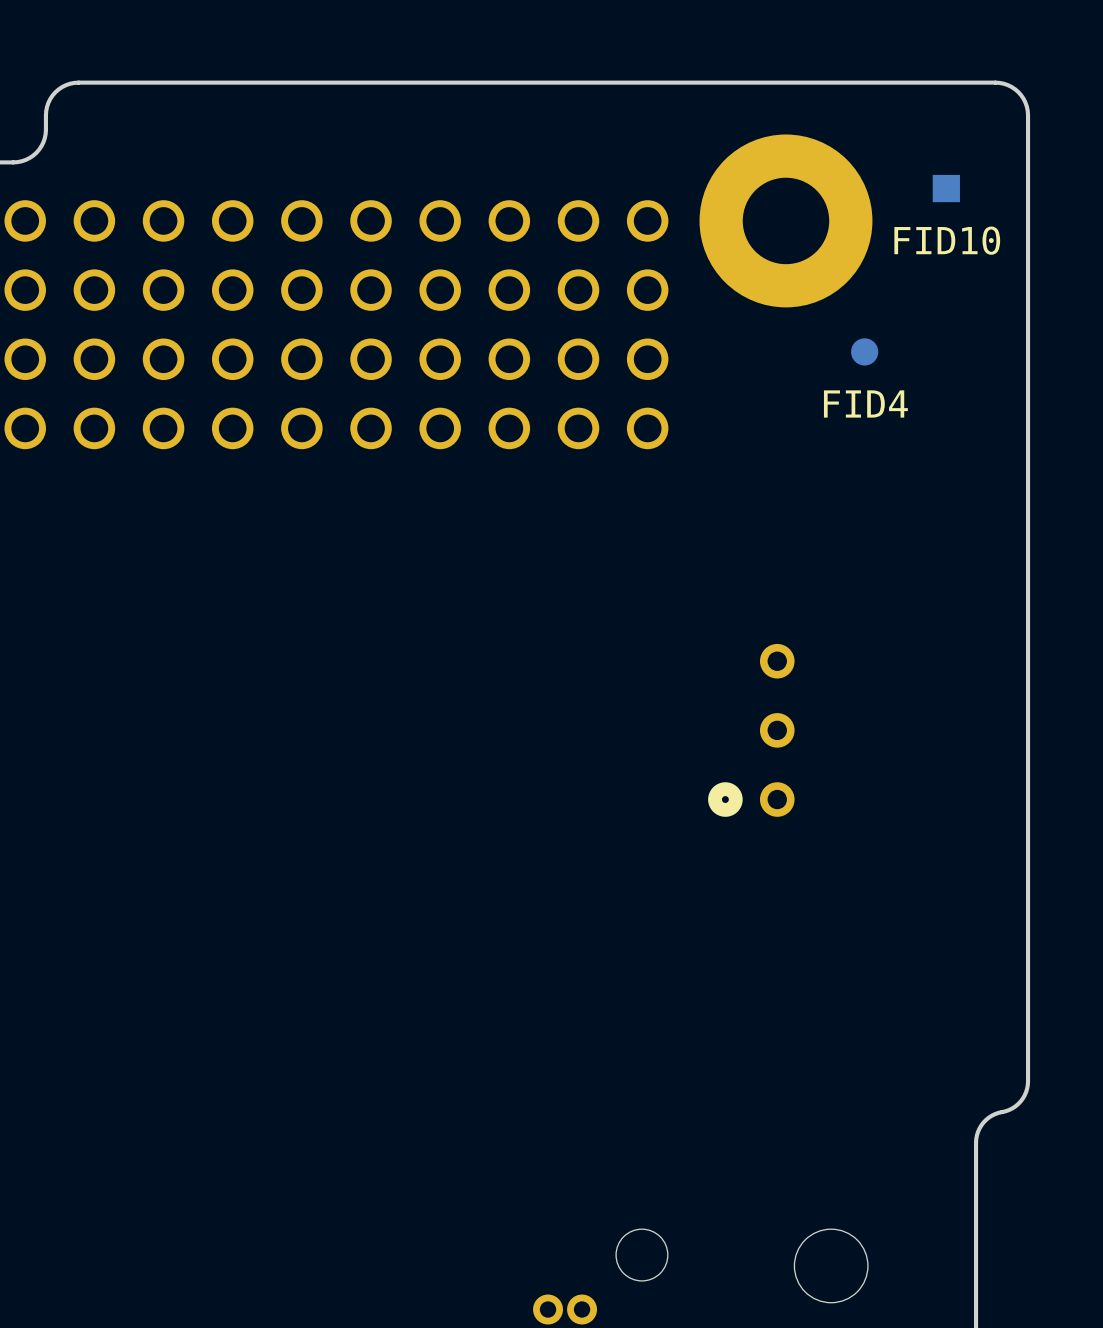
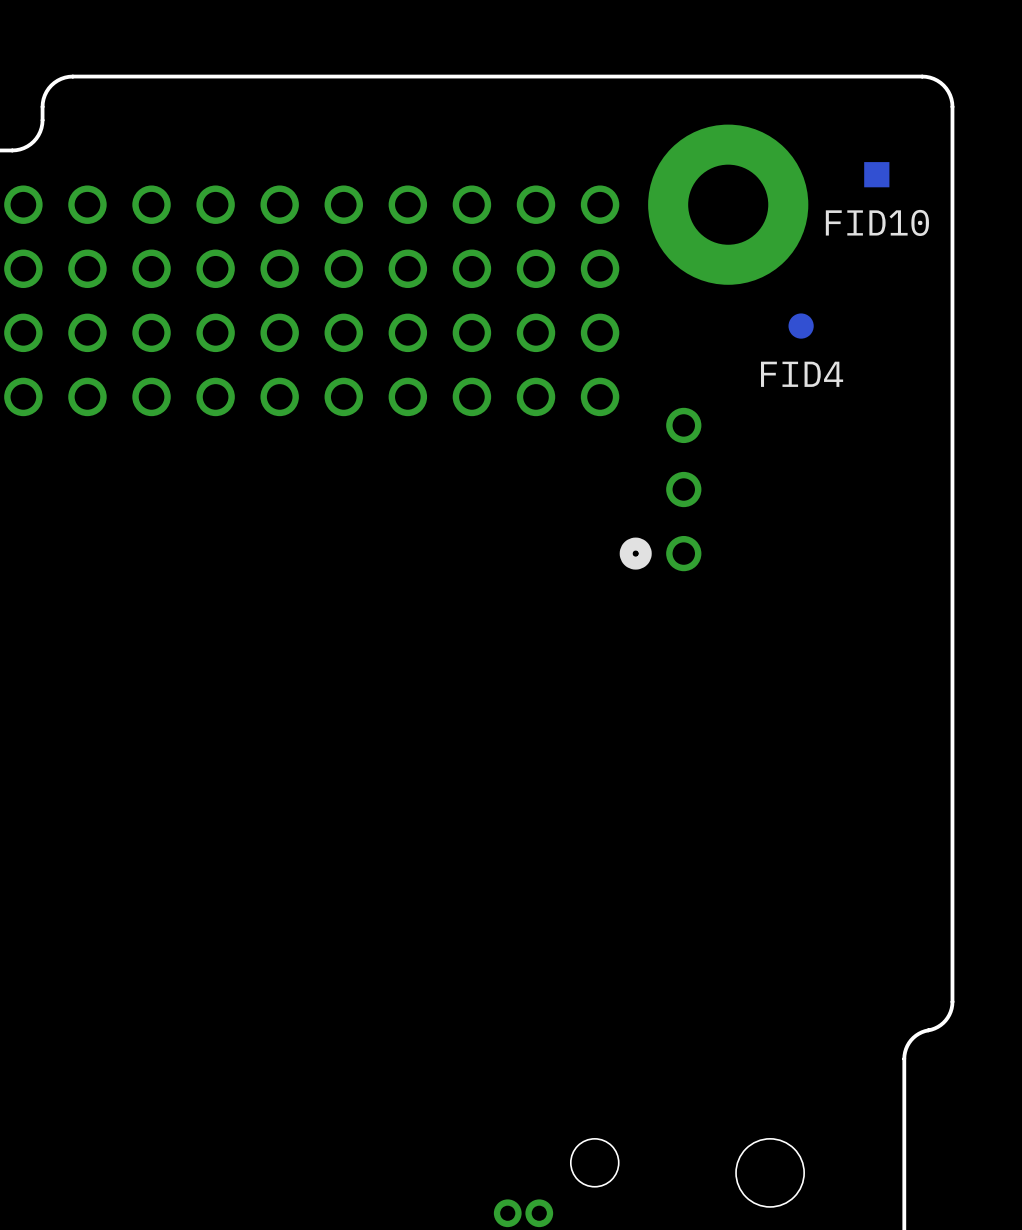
part: none -> (660, 489)
part: (751, 730) -> none

